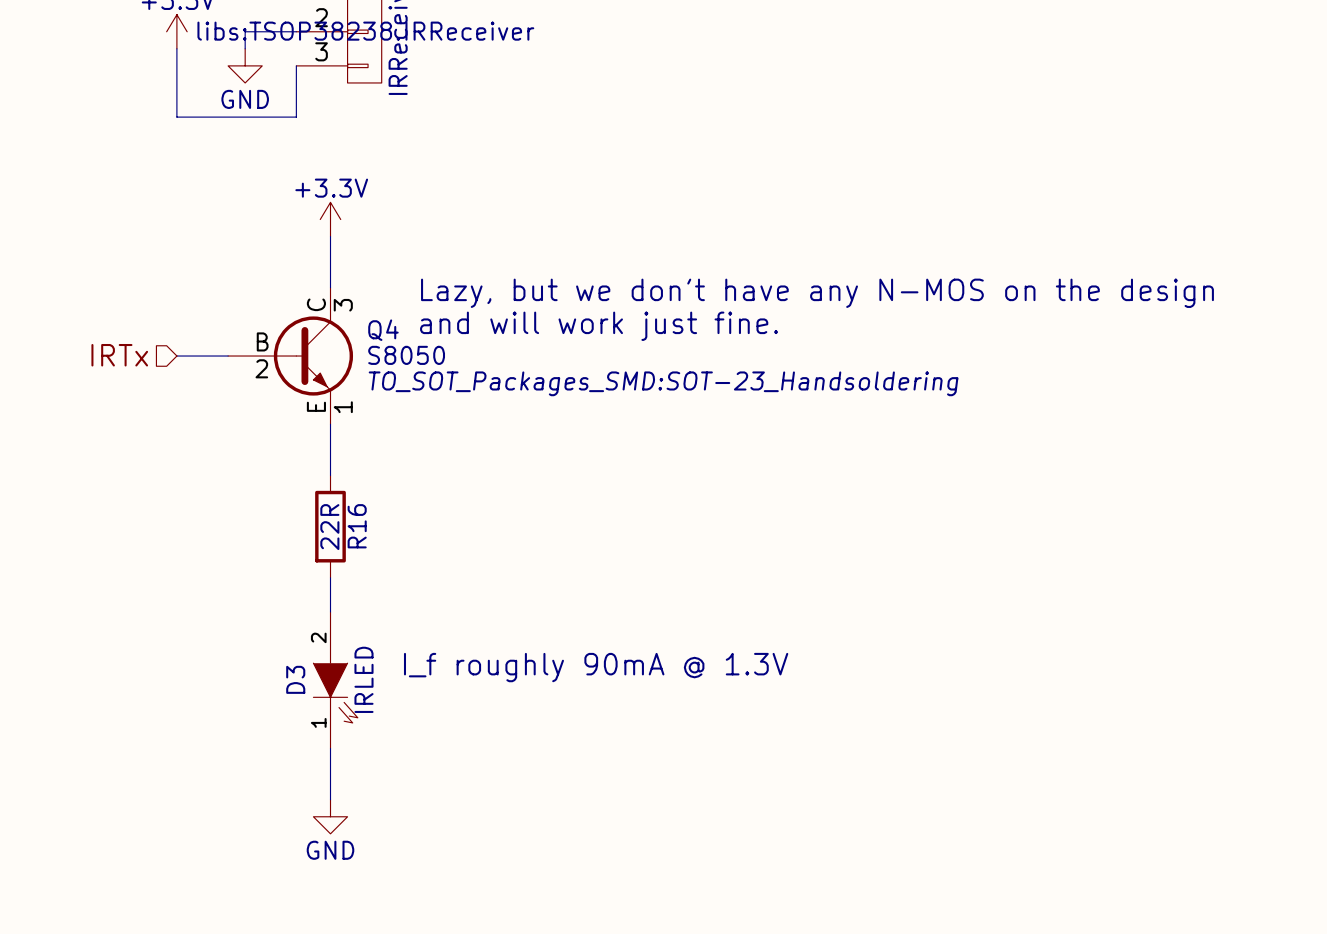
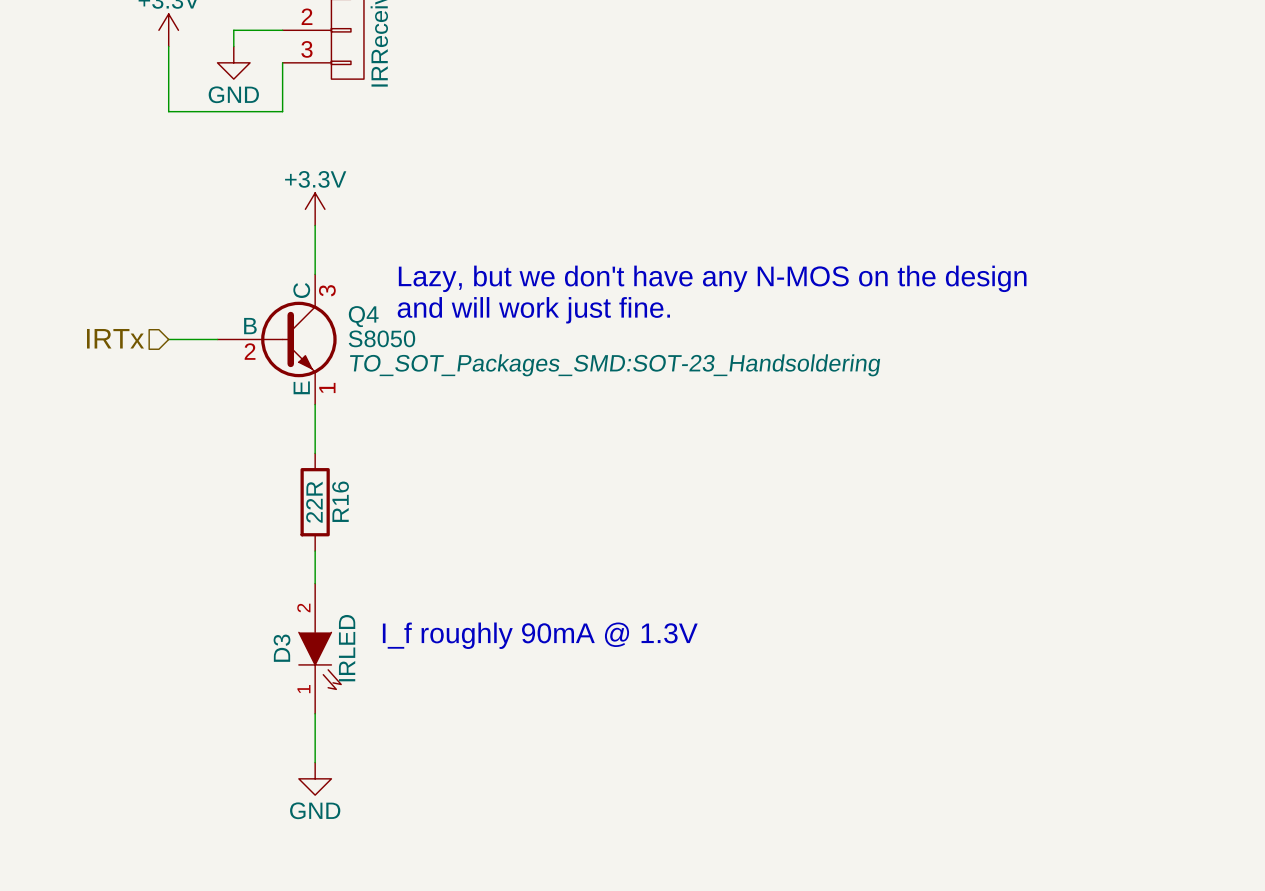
part text: libs:TSOP38238.IRReceiver (365, 31) -> none

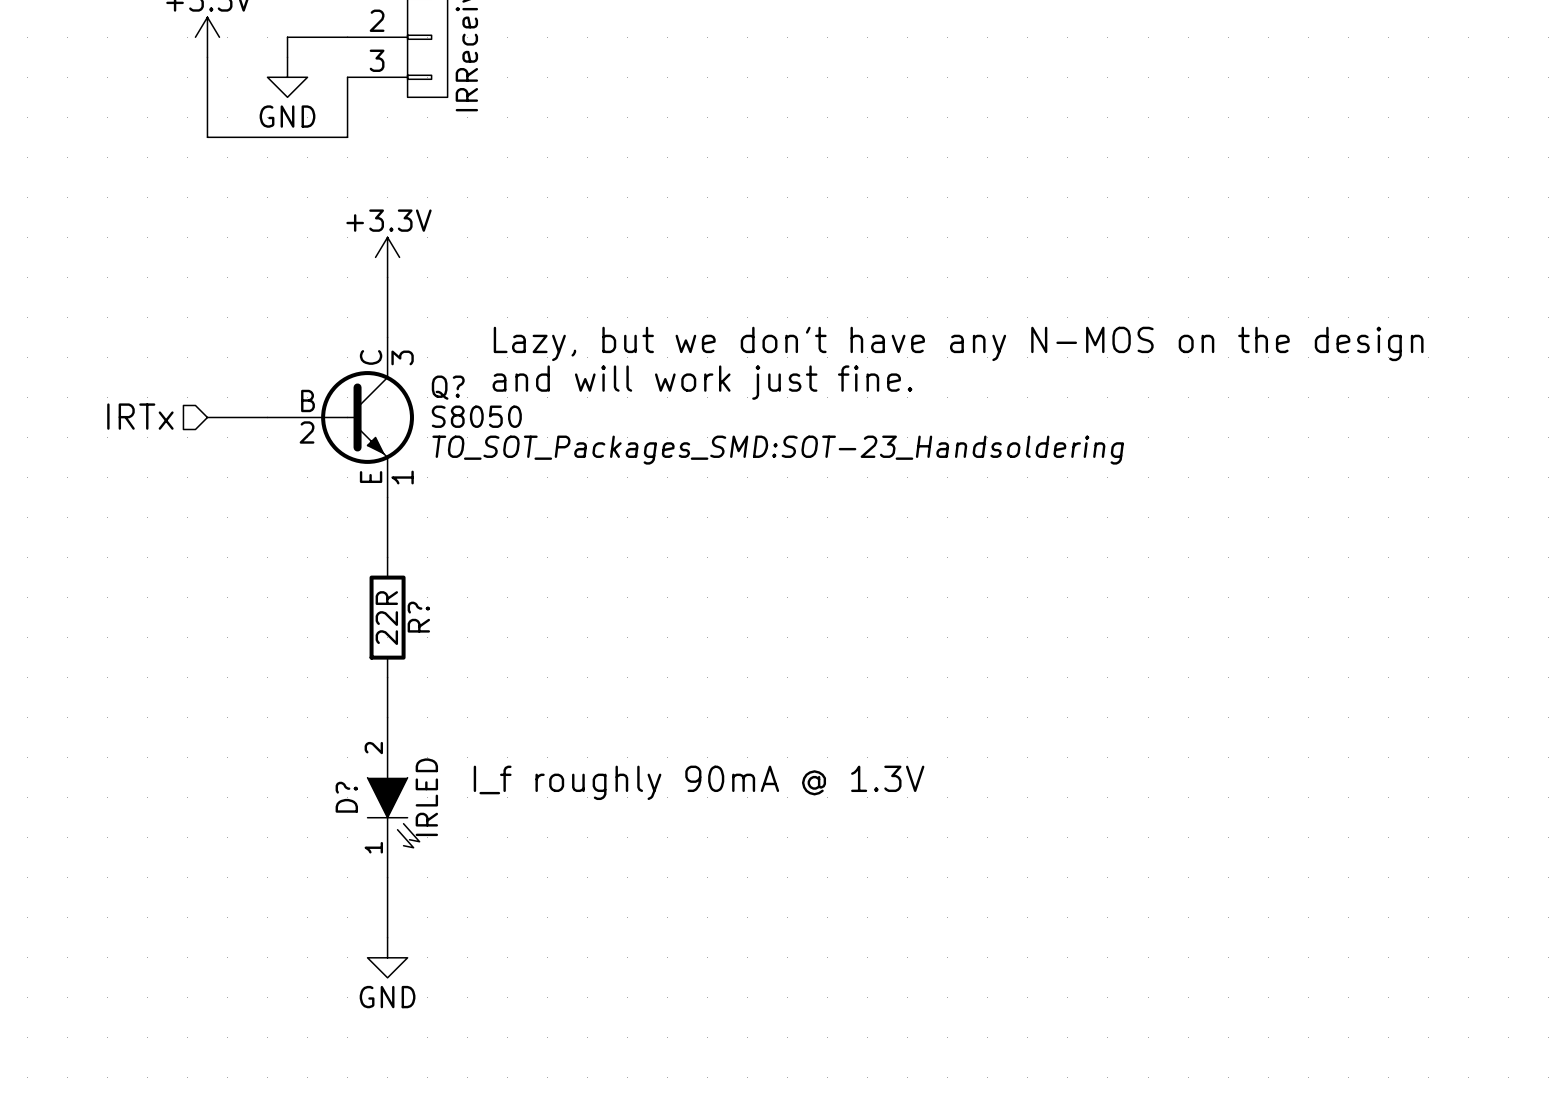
Q4 name: Q4 (363, 316) -> Q? (448, 387)
R16 name: R16 (340, 501) -> R? (418, 617)
D3 name: D3 (281, 648) -> D? (346, 797)

